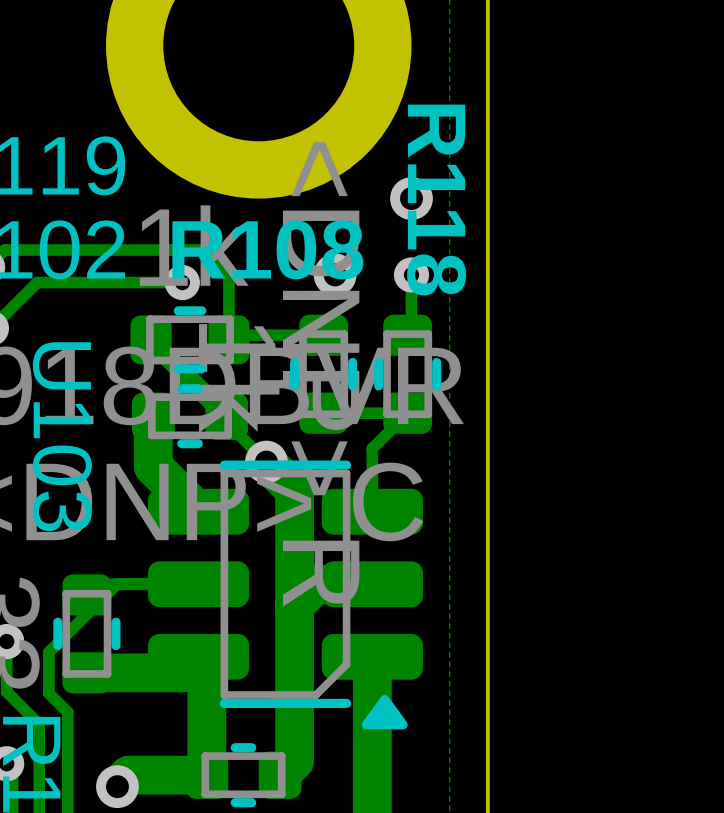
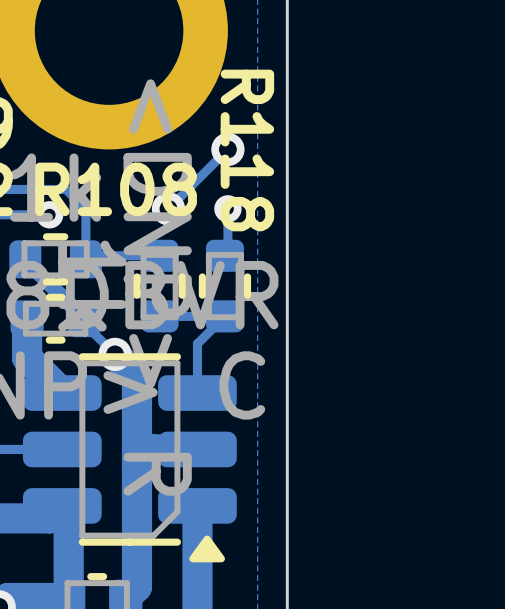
track: none -> (227, 149) (168, 208)

